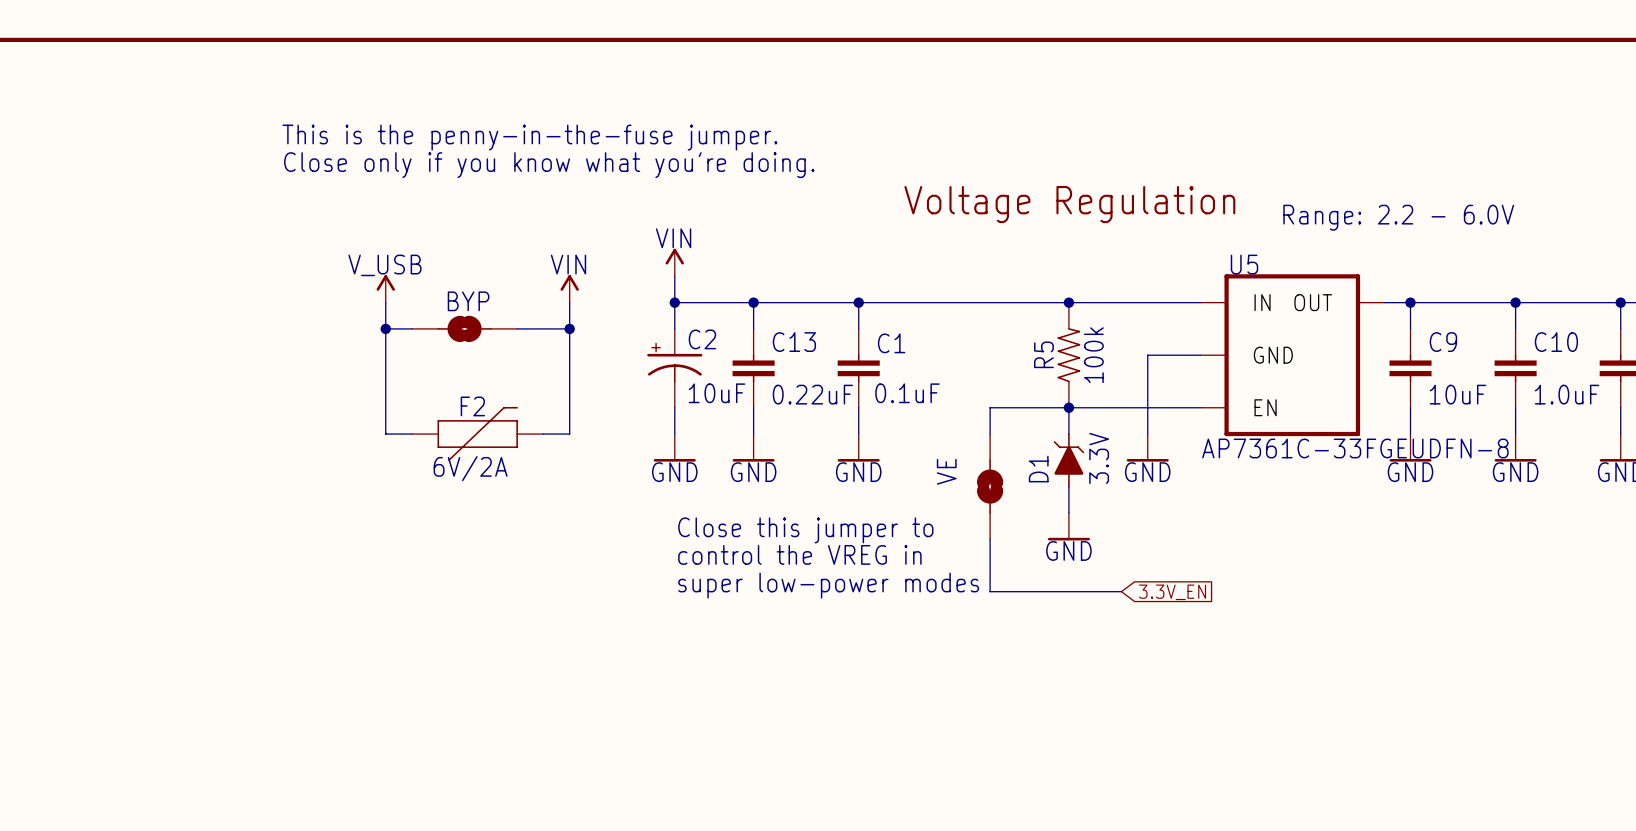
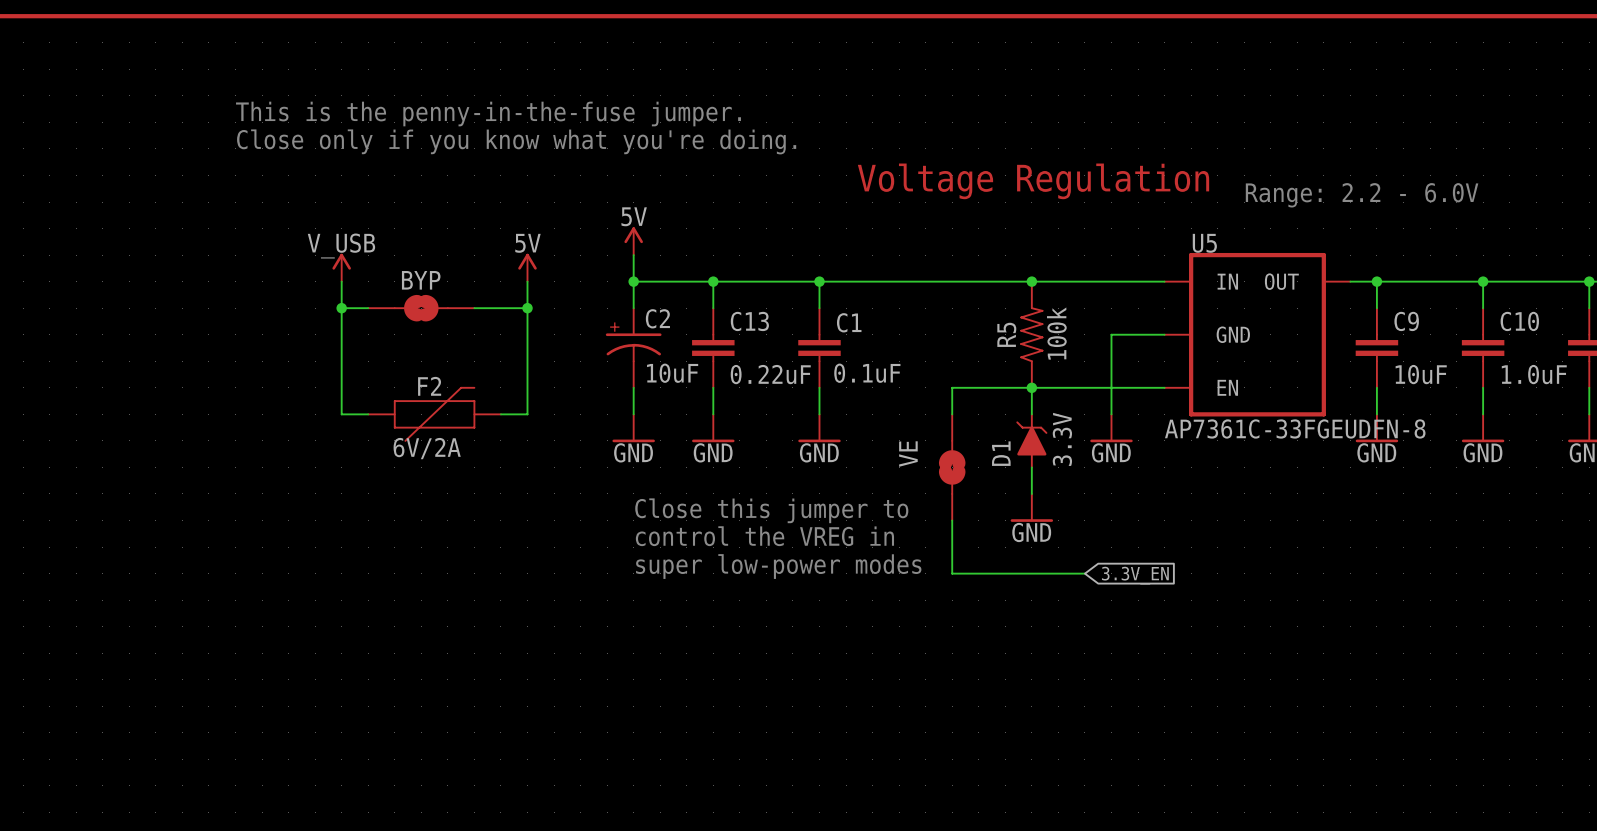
power symbol: VIN (674, 262) -> 5V (633, 241)
power symbol: VIN (569, 288) -> 5V (527, 267)

